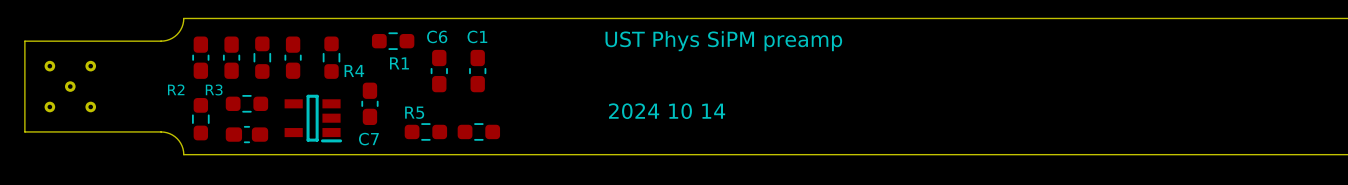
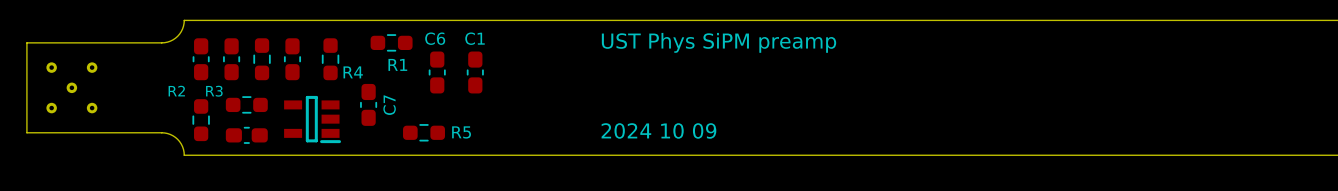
text: 2024 10 14 (667, 111) -> 2024 10 09 (658, 130)
R5 name position: R5 (414, 112) -> R5 (461, 132)
part: (478, 131) -> none
C7 name rotation: 0° (368, 139) -> 90° counterclockwise (389, 105)
C7 name position: C7 (368, 139) -> C7 (389, 105)

